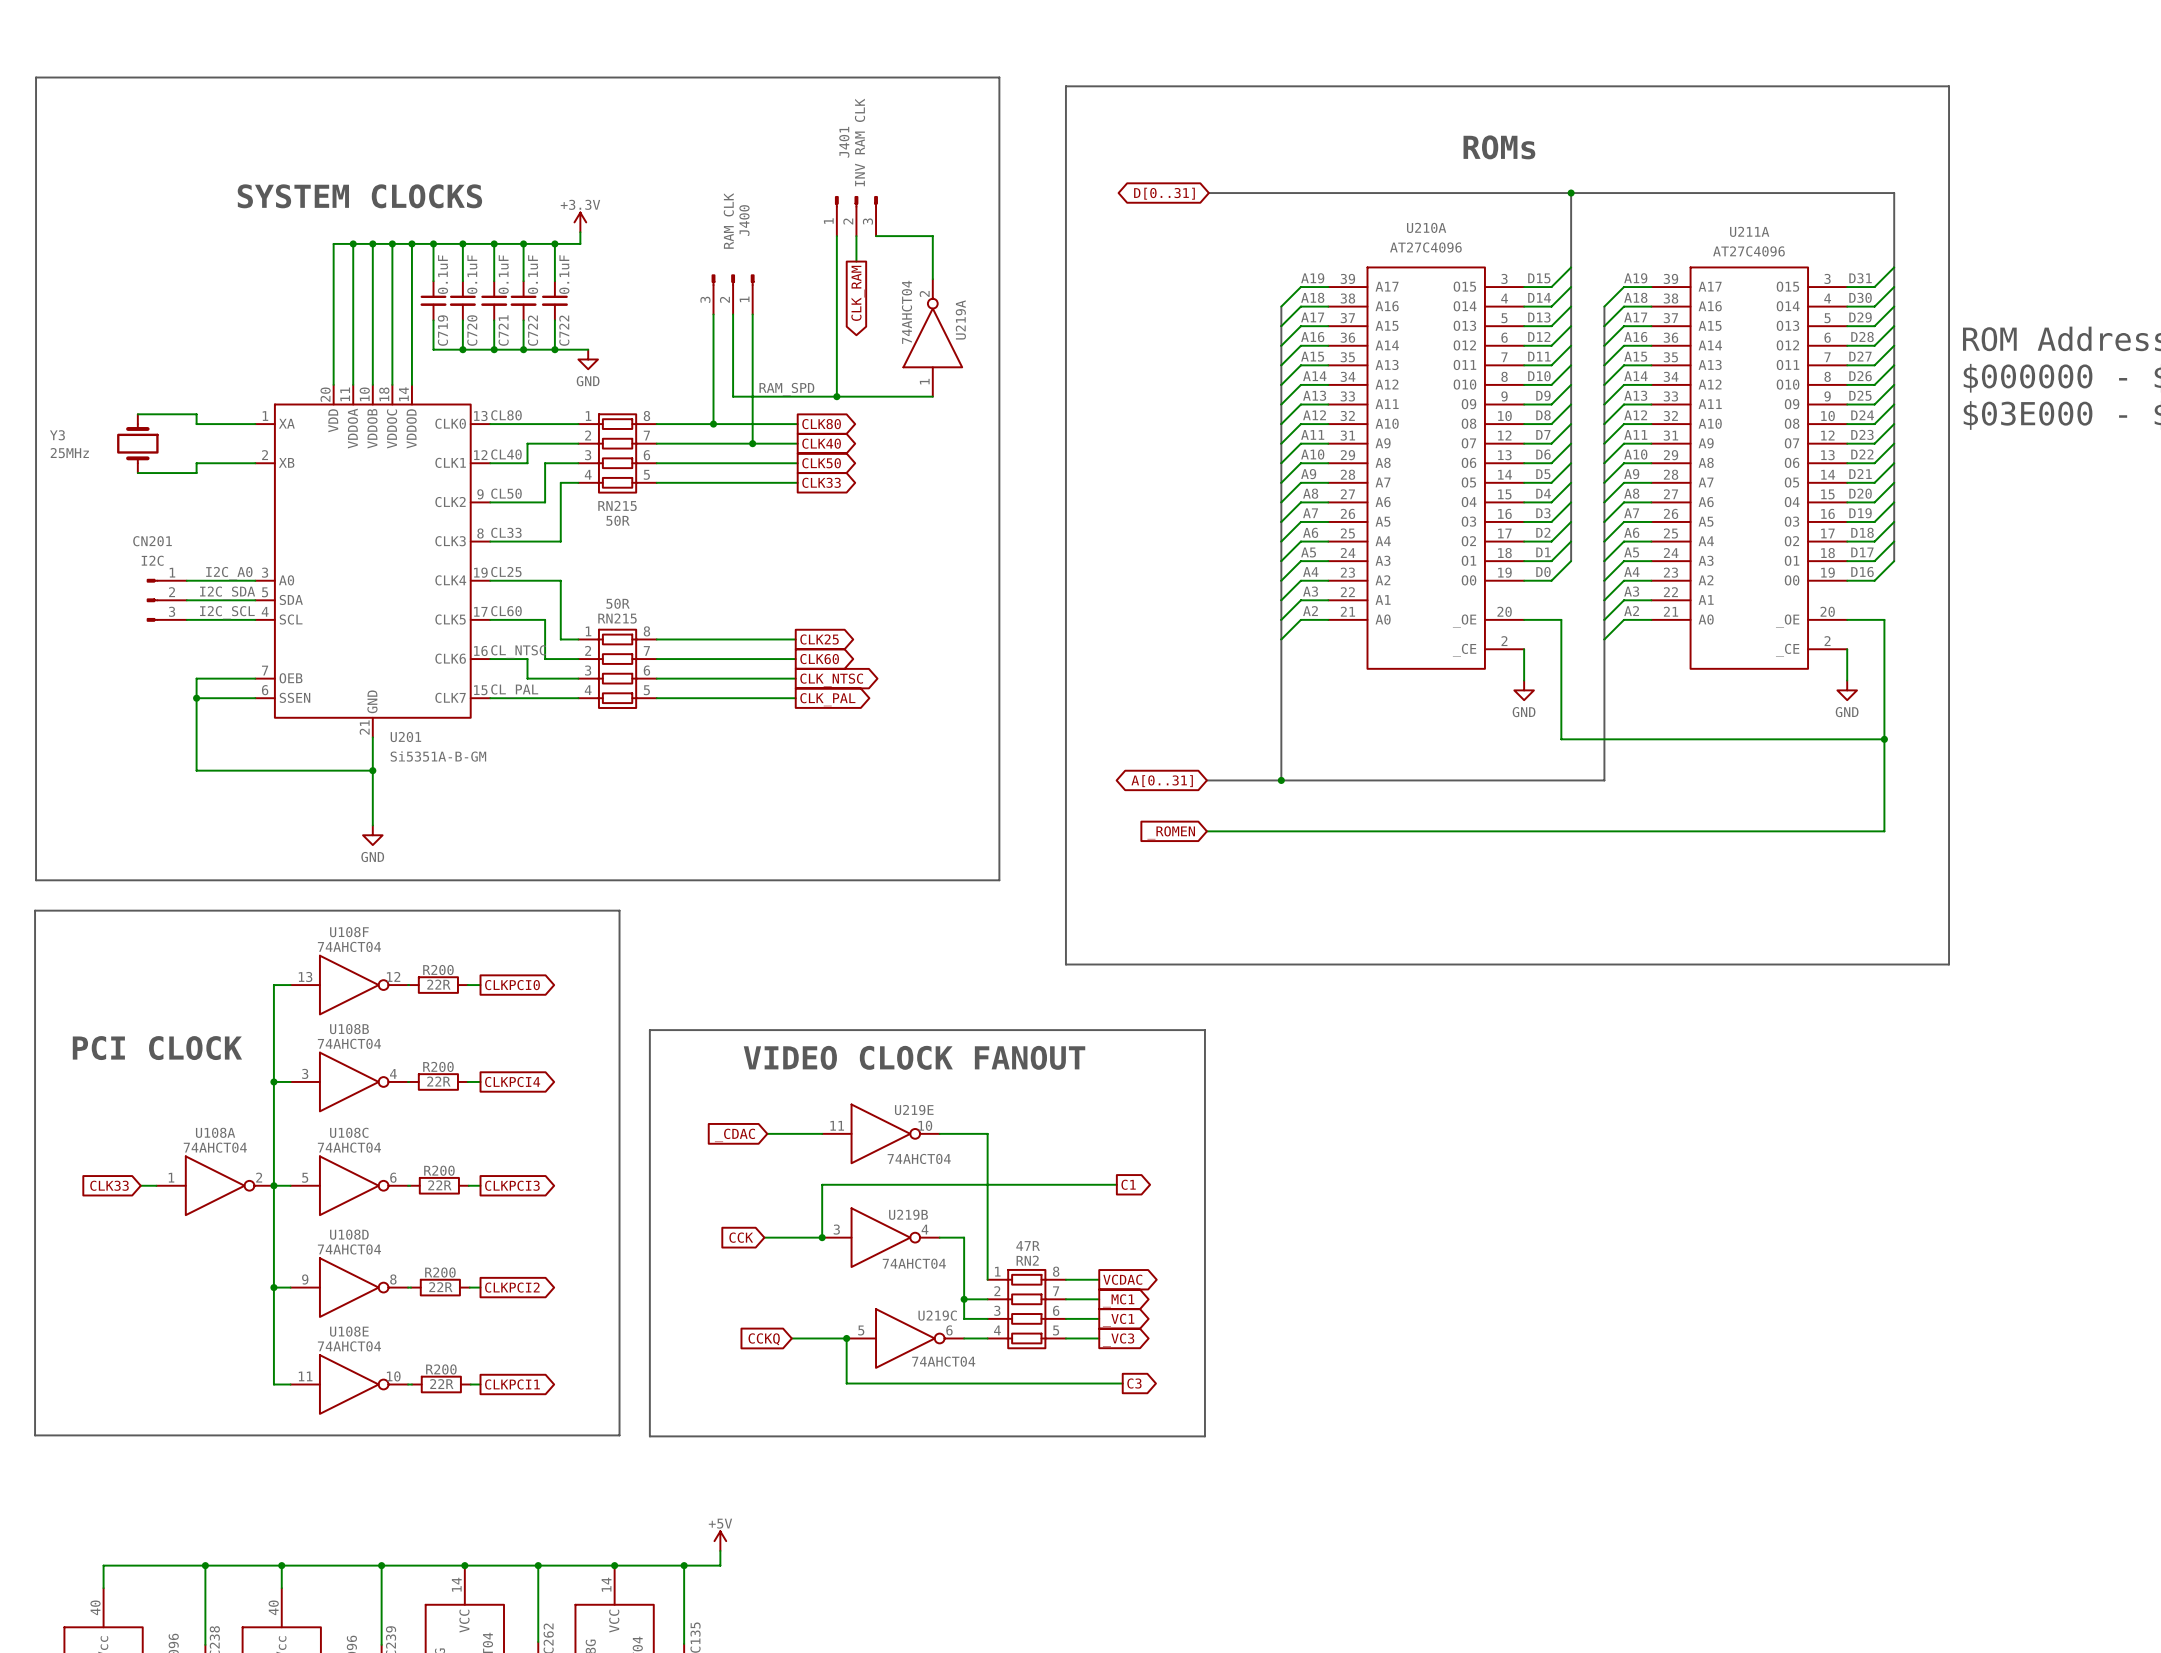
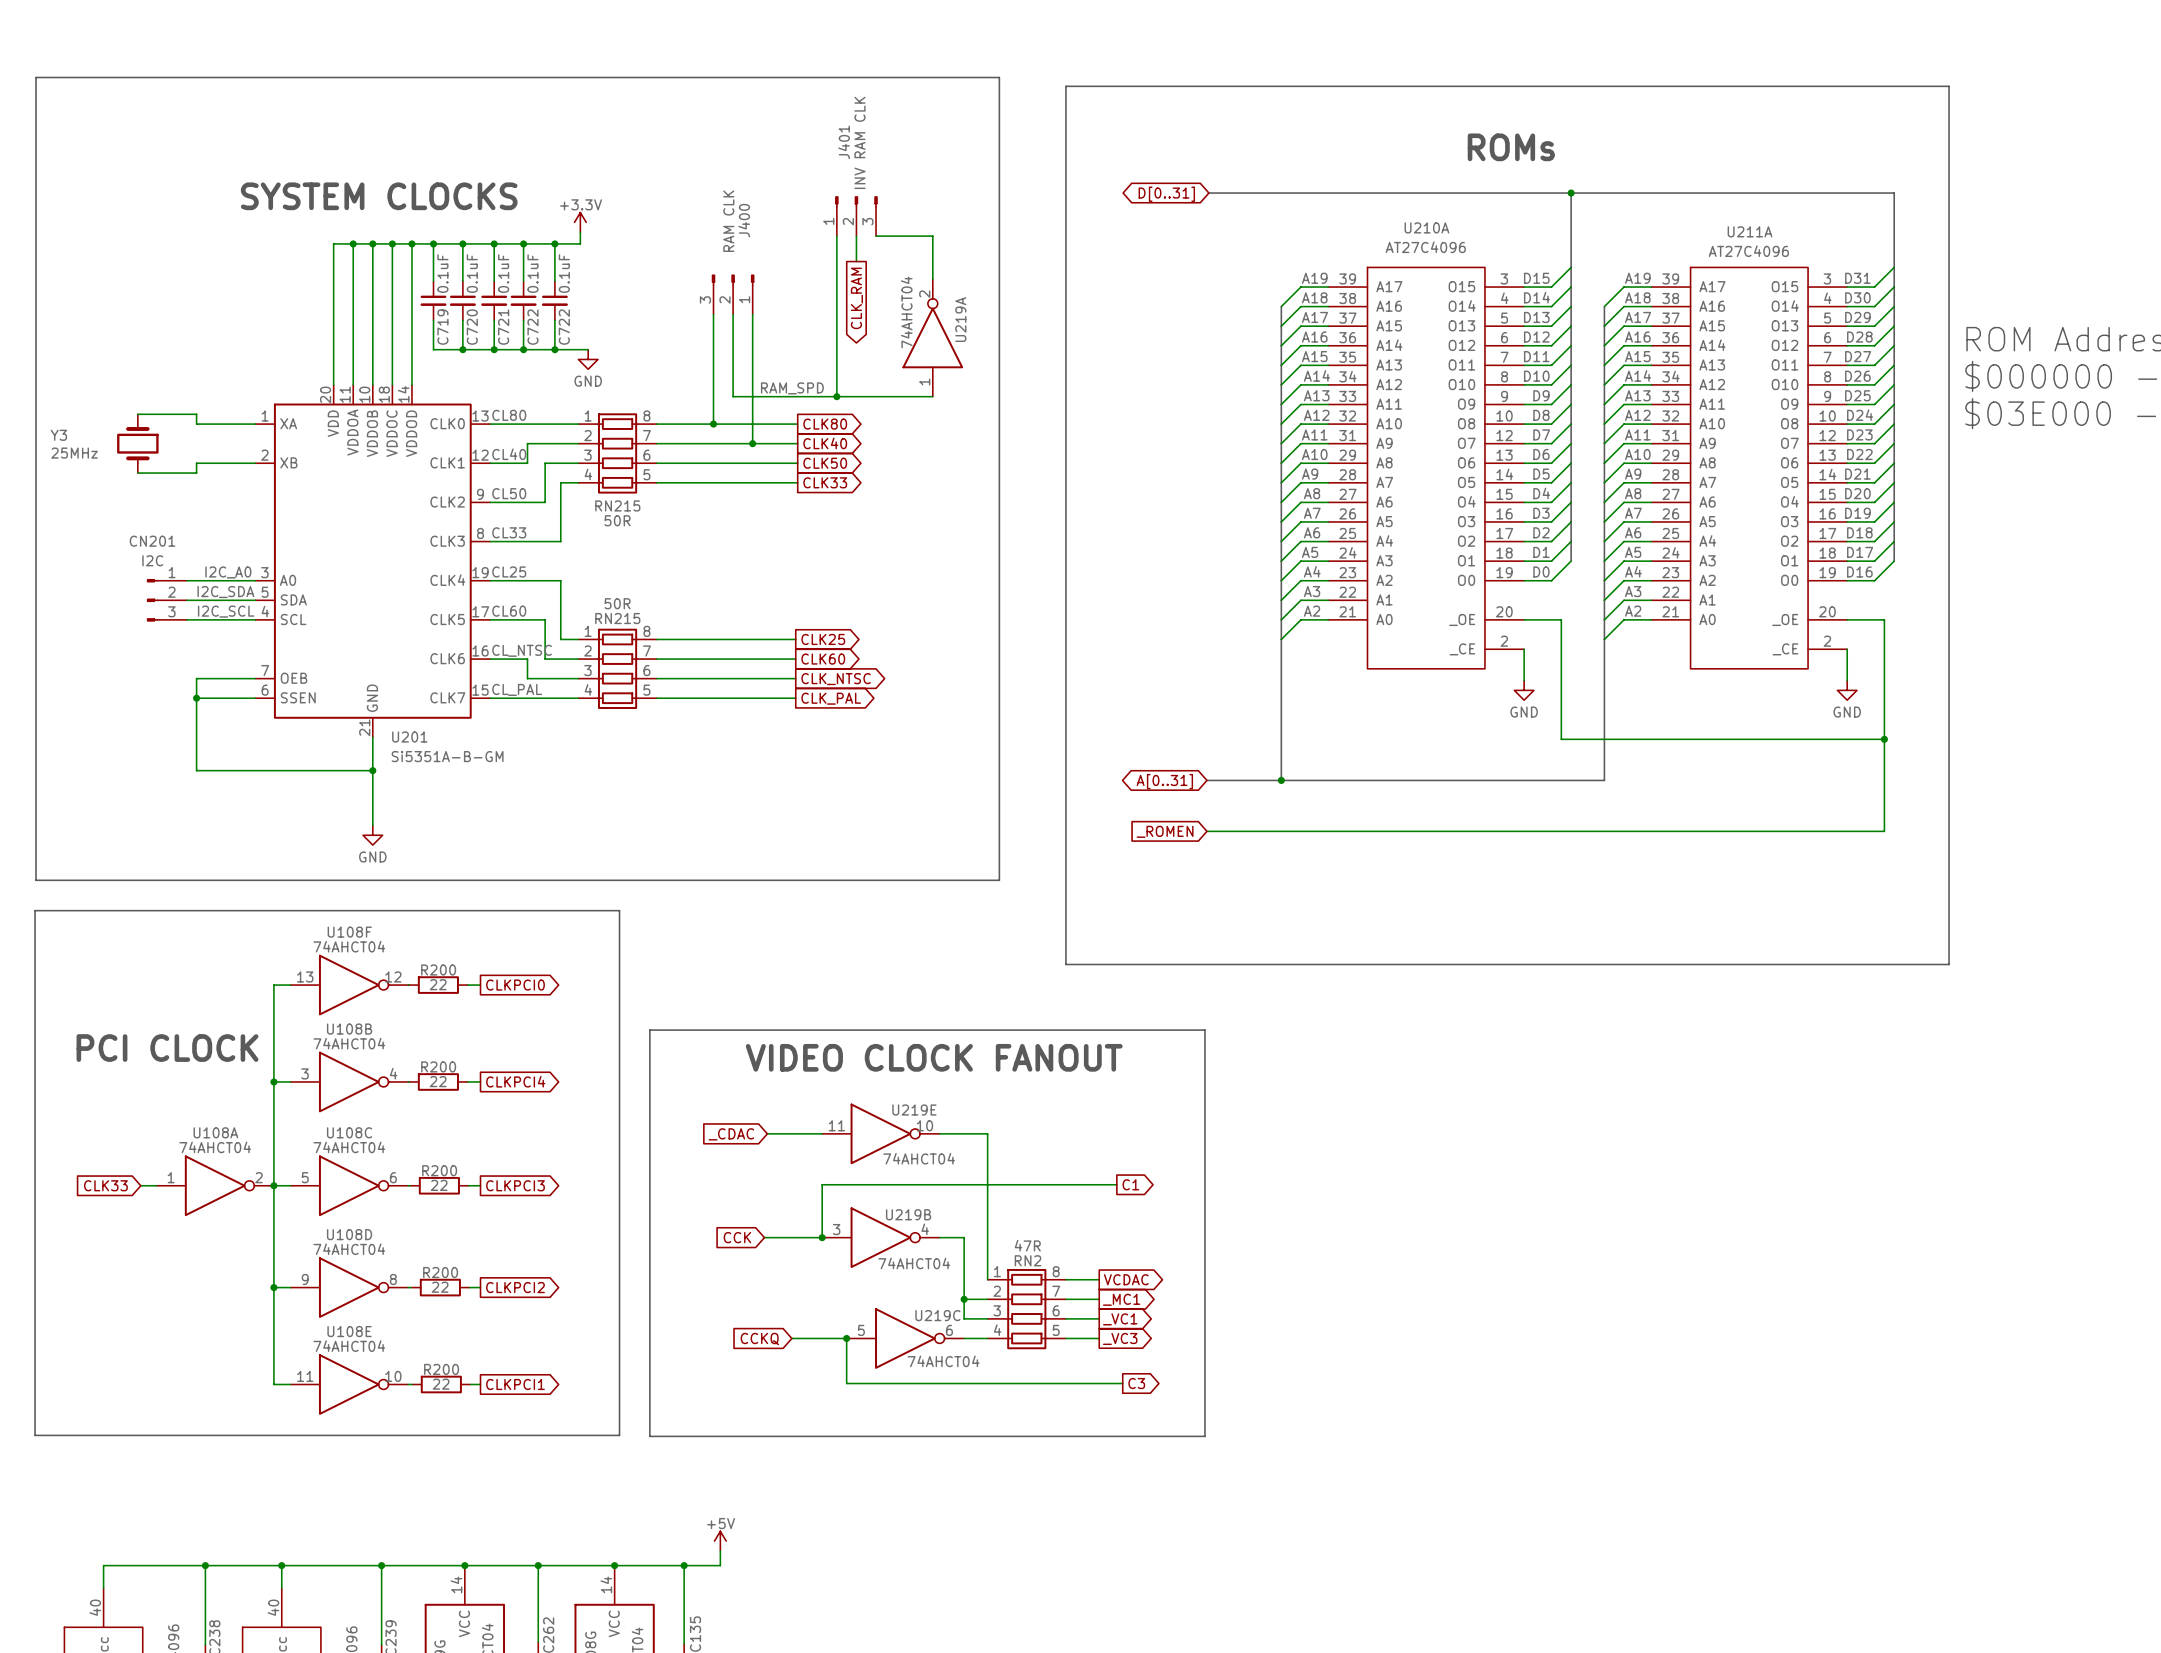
R200 value: 22R (438, 984) -> 22 (438, 984)
R200 value: 22R (438, 1081) -> 22 (438, 1081)
R200 value: 22R (439, 1185) -> 22 (439, 1185)
R200 value: 22R (440, 1287) -> 22 (440, 1287)
R200 value: 22R (441, 1384) -> 22 (441, 1384)

